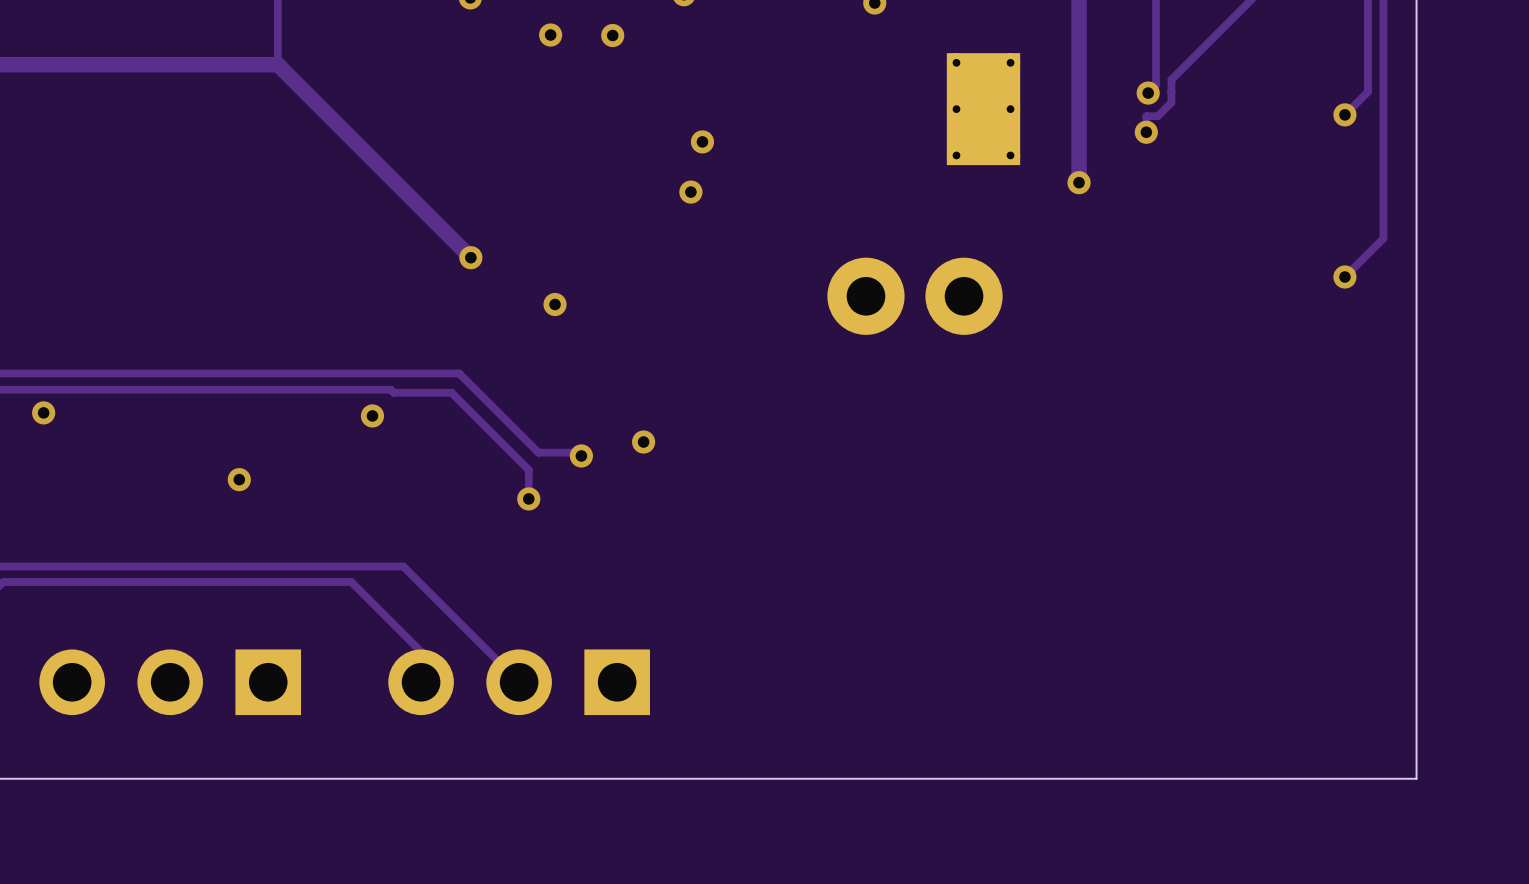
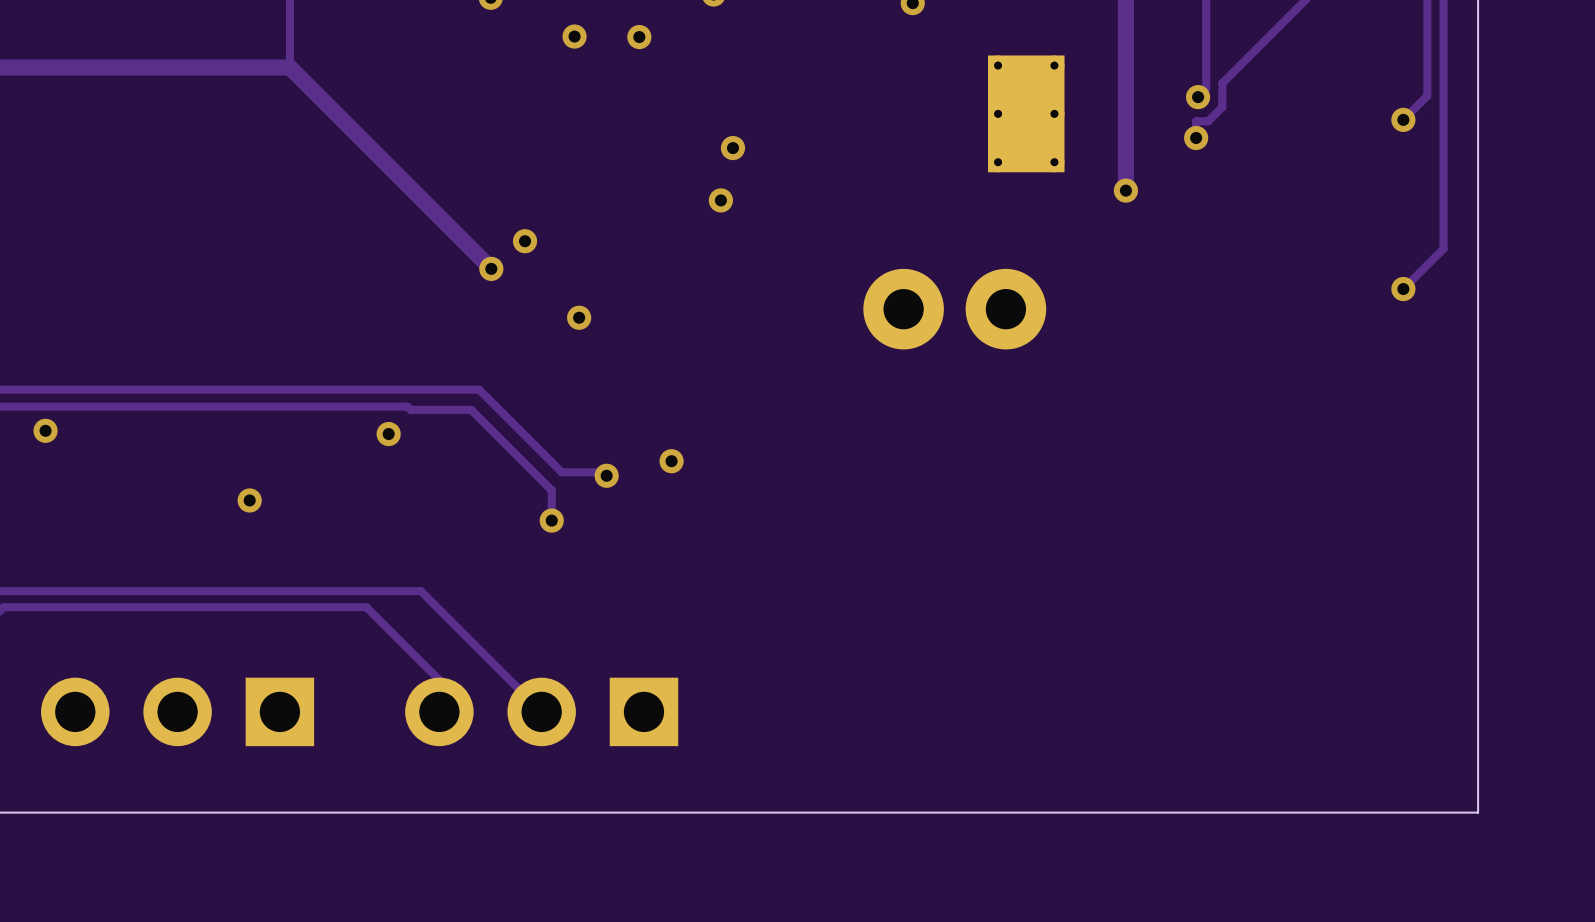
via: none -> (525, 241)

